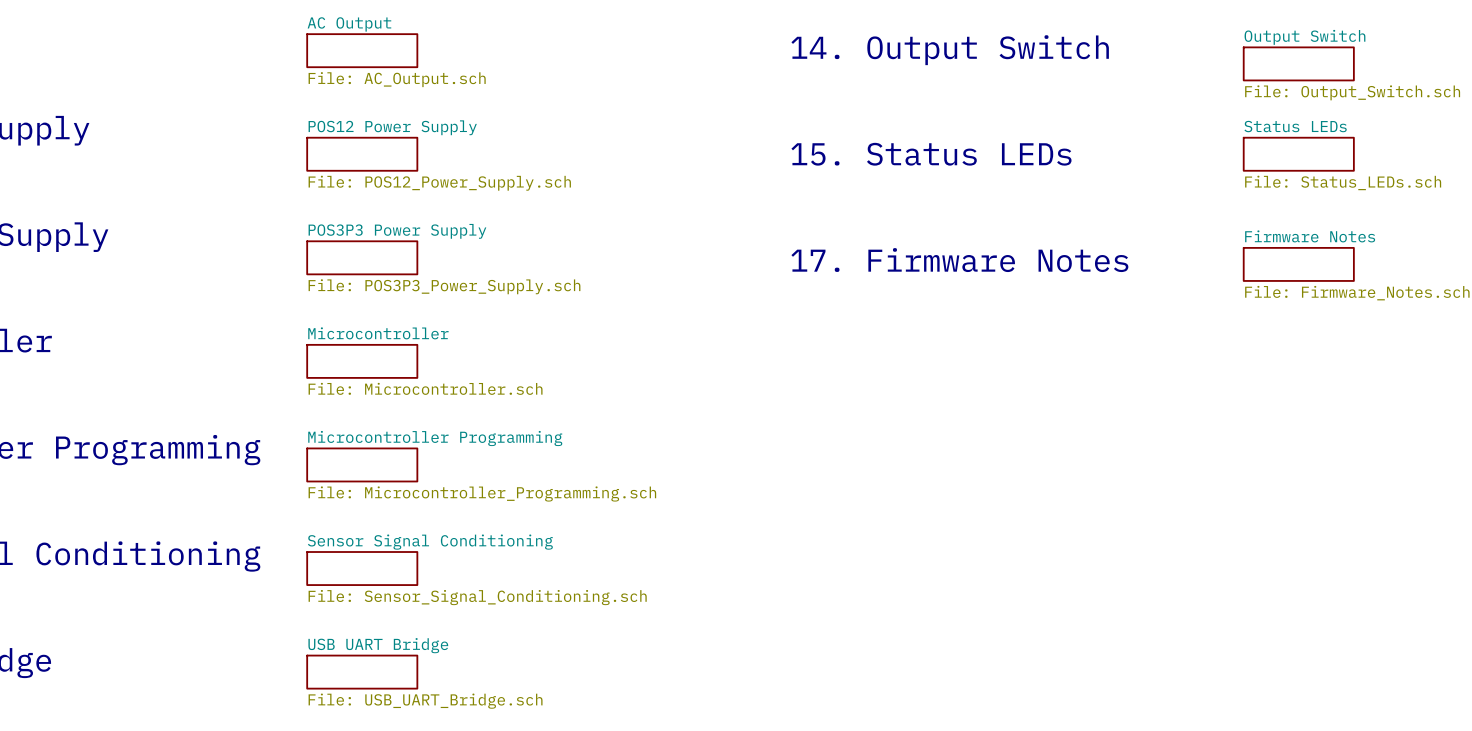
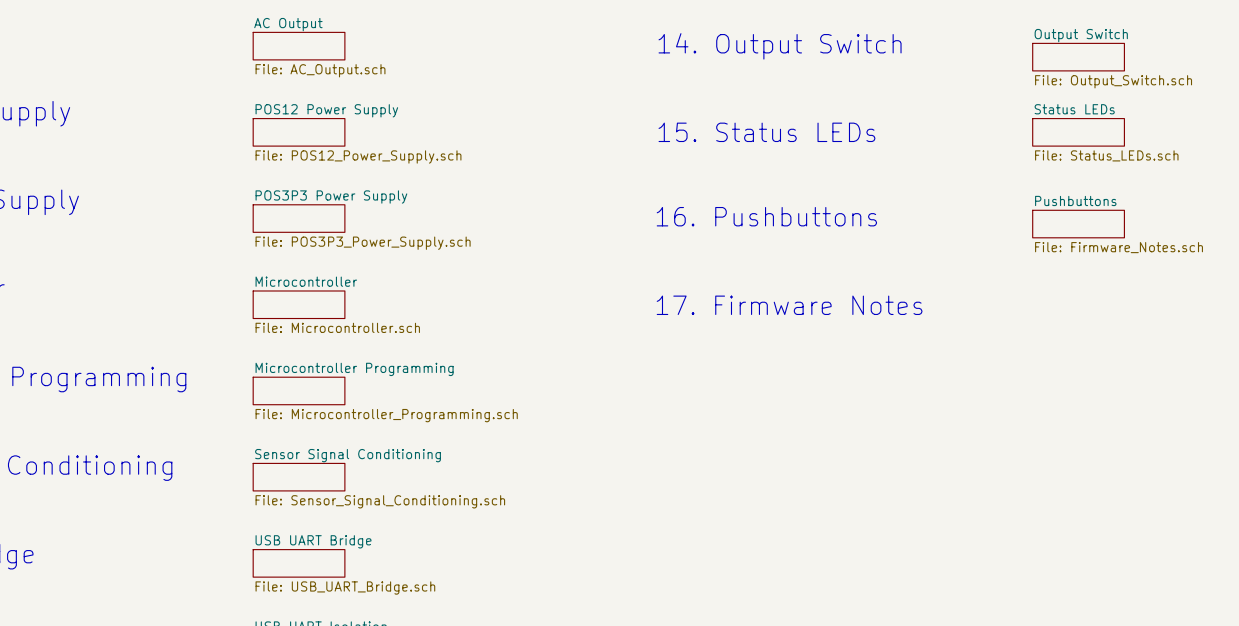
sheet Firmware Notes name: Firmware Notes (1310, 236) -> Pushbuttons (1075, 200)
text: none -> 16. Pushbuttons (766, 216)
text position: 17. Firmware Notes (959, 260) -> 17. Firmware Notes (789, 305)

